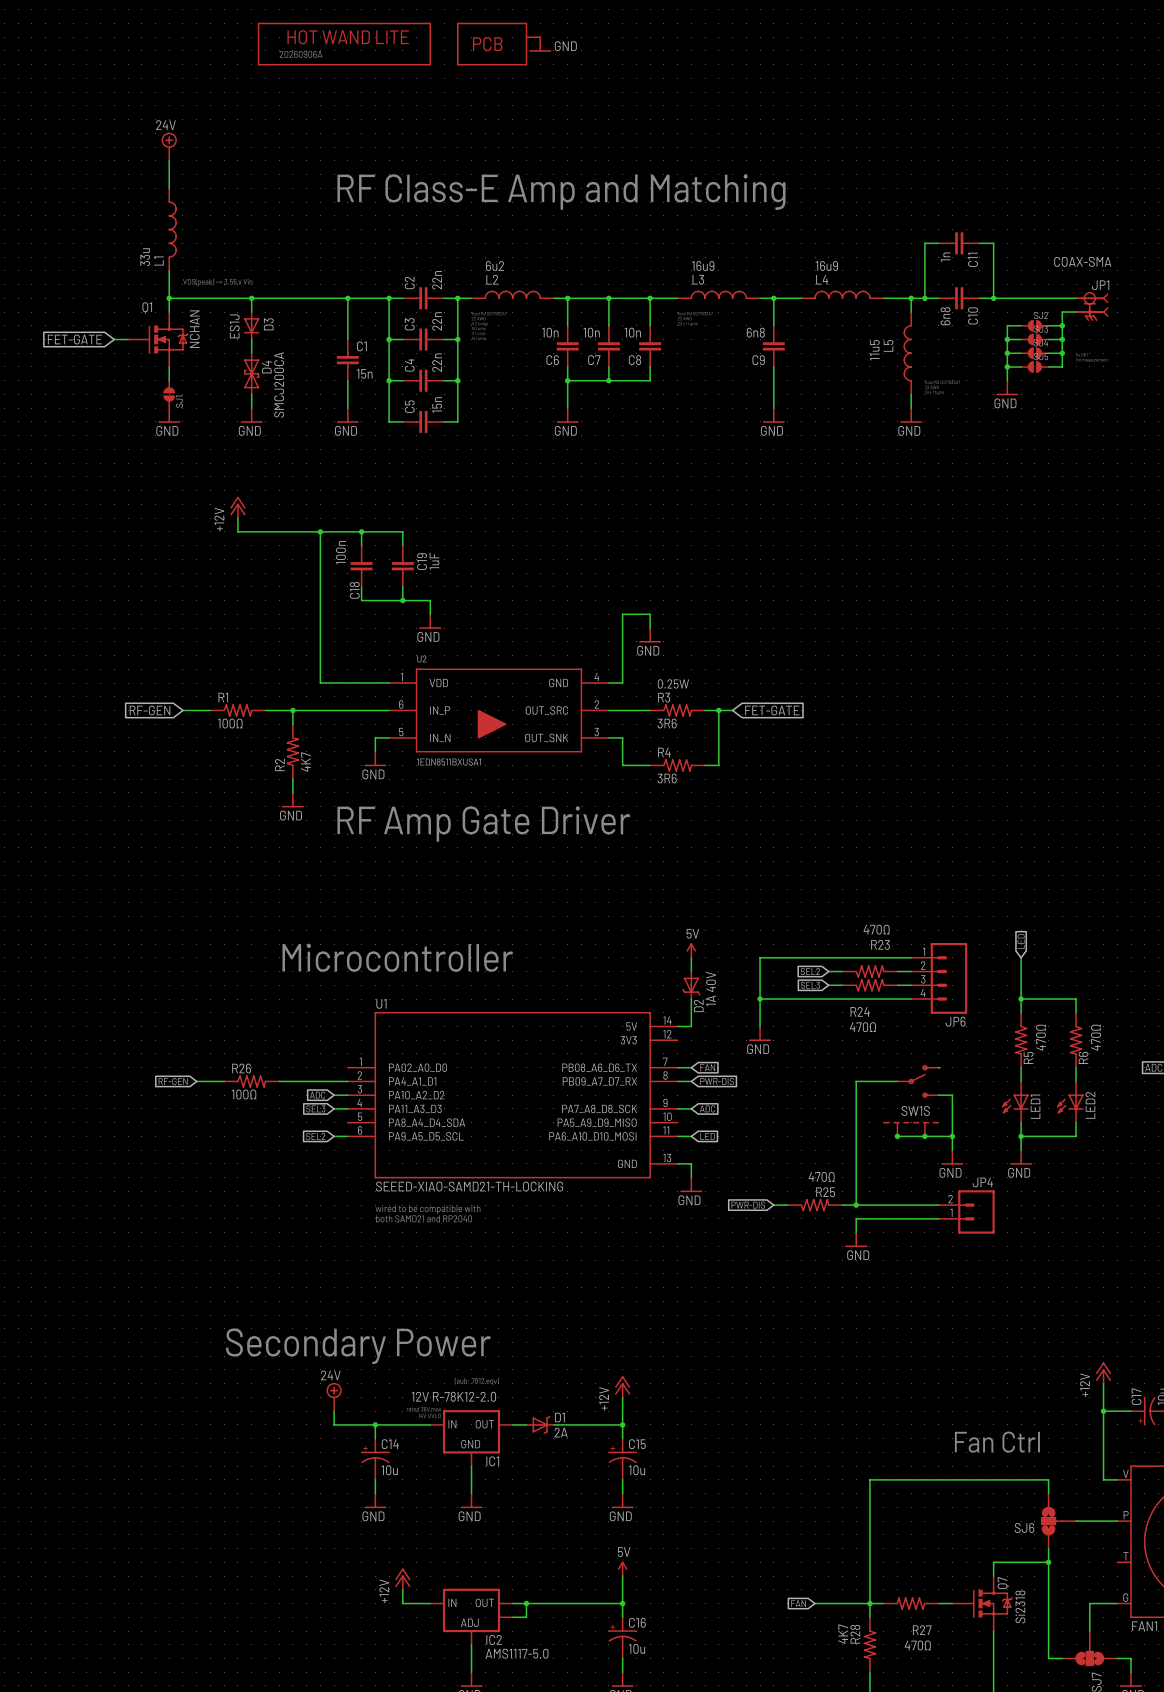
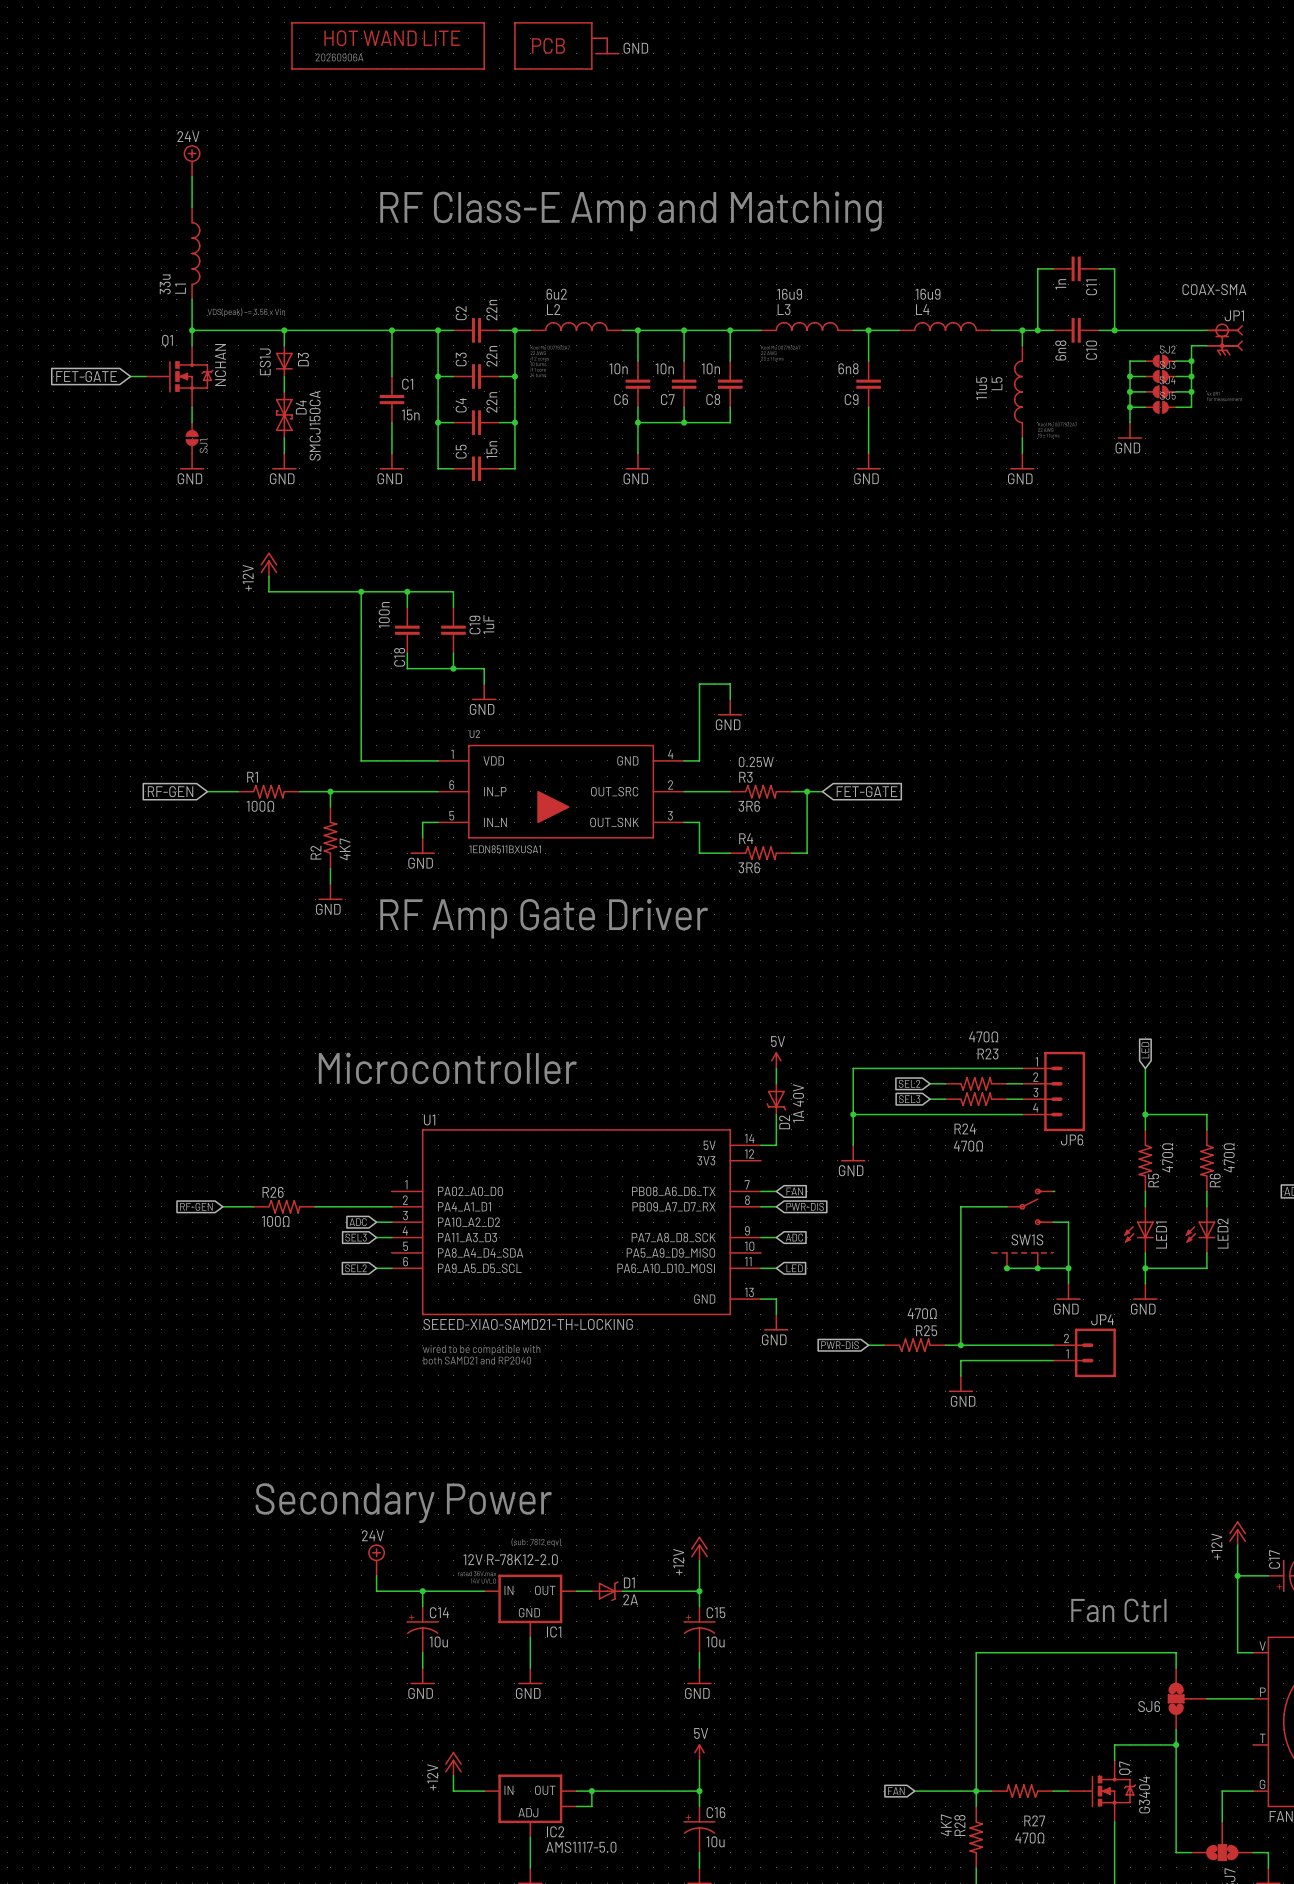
D4 value: SMCJ200CA (279, 384) -> SMCJ150CA (315, 425)
Q7 value: Si2318 (1020, 1606) -> G3404 (1144, 1794)

